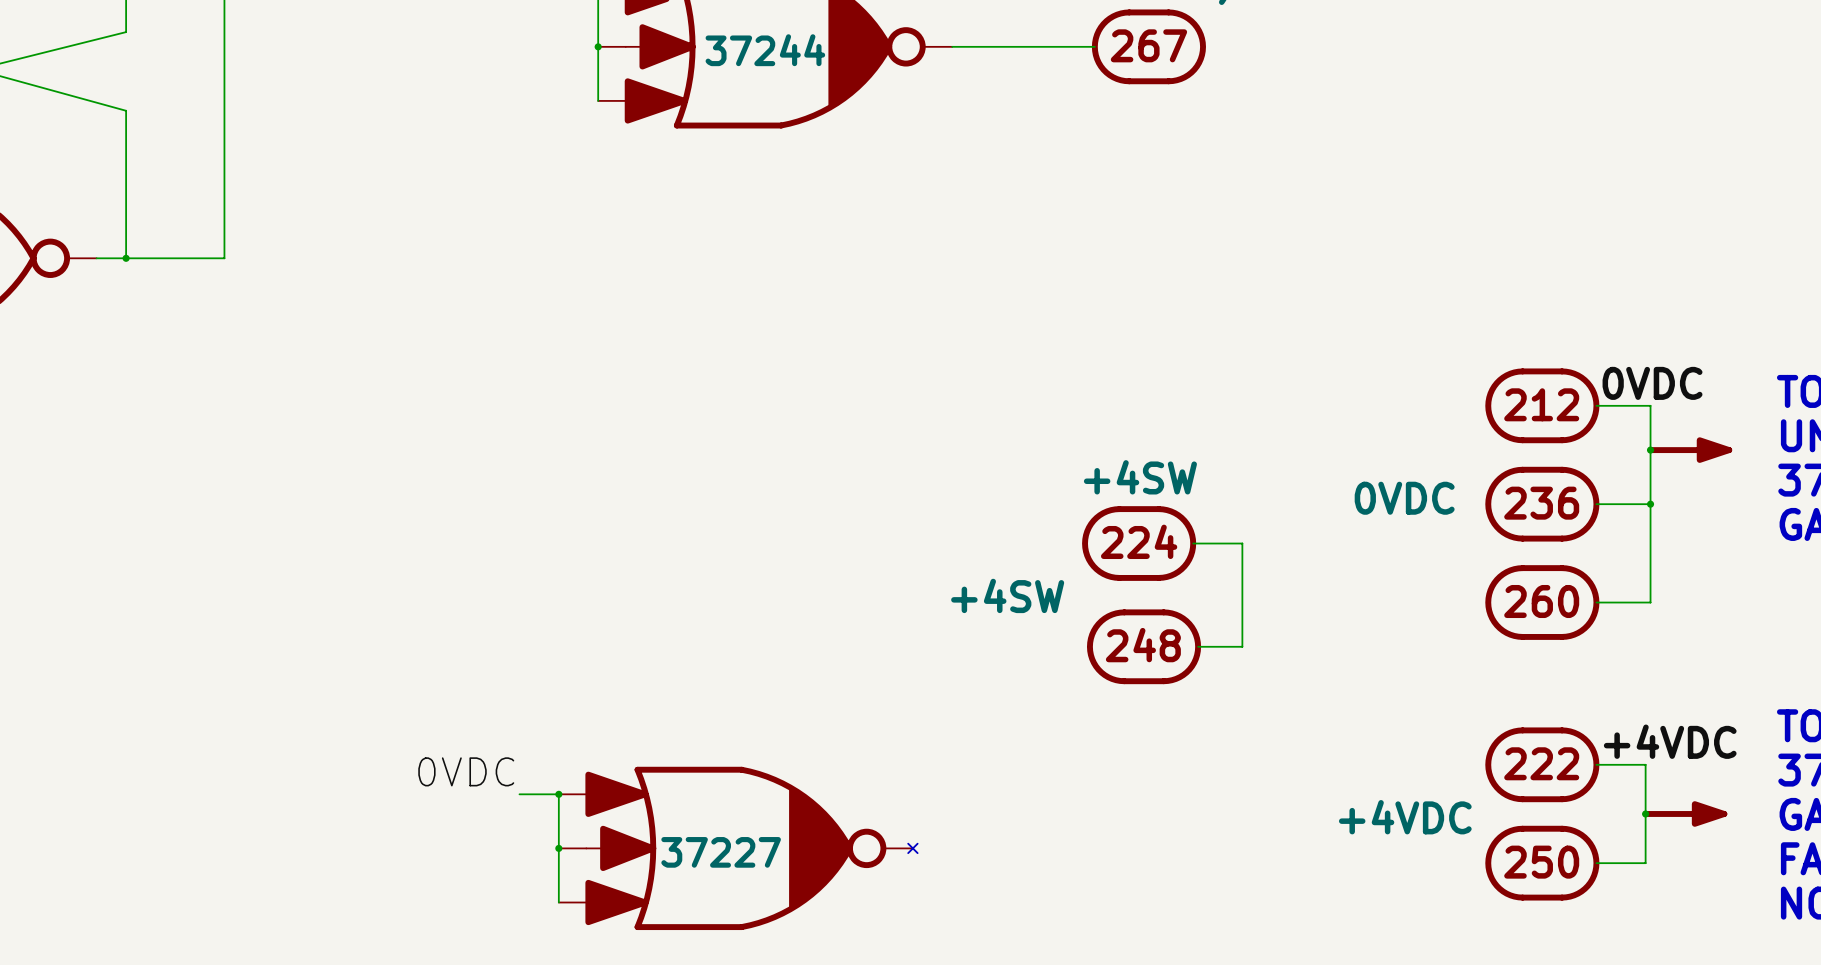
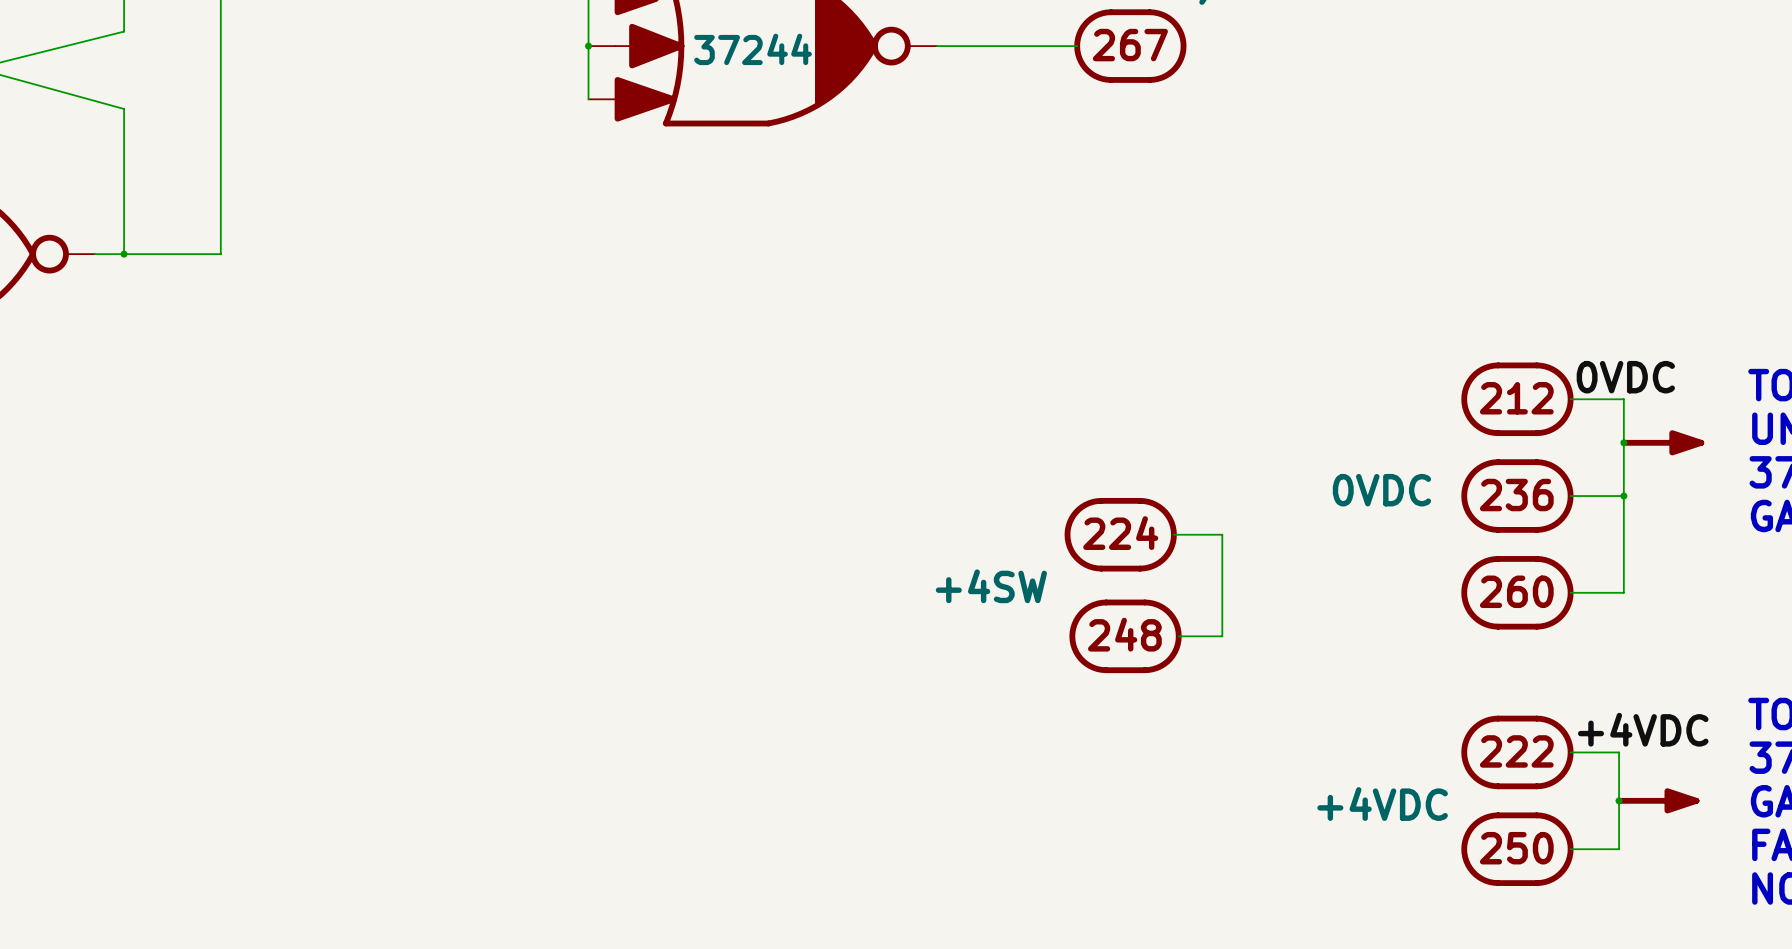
part text: +4SW (1140, 477) -> none
label: 0VDC (466, 771) -> none
wire: (519, 794) (558, 794) (558, 902) -> none
junction: (558, 794) -> none
junction: (558, 848) -> none
part: (735, 848) -> none
no-connect mark: (912, 848) -> none

